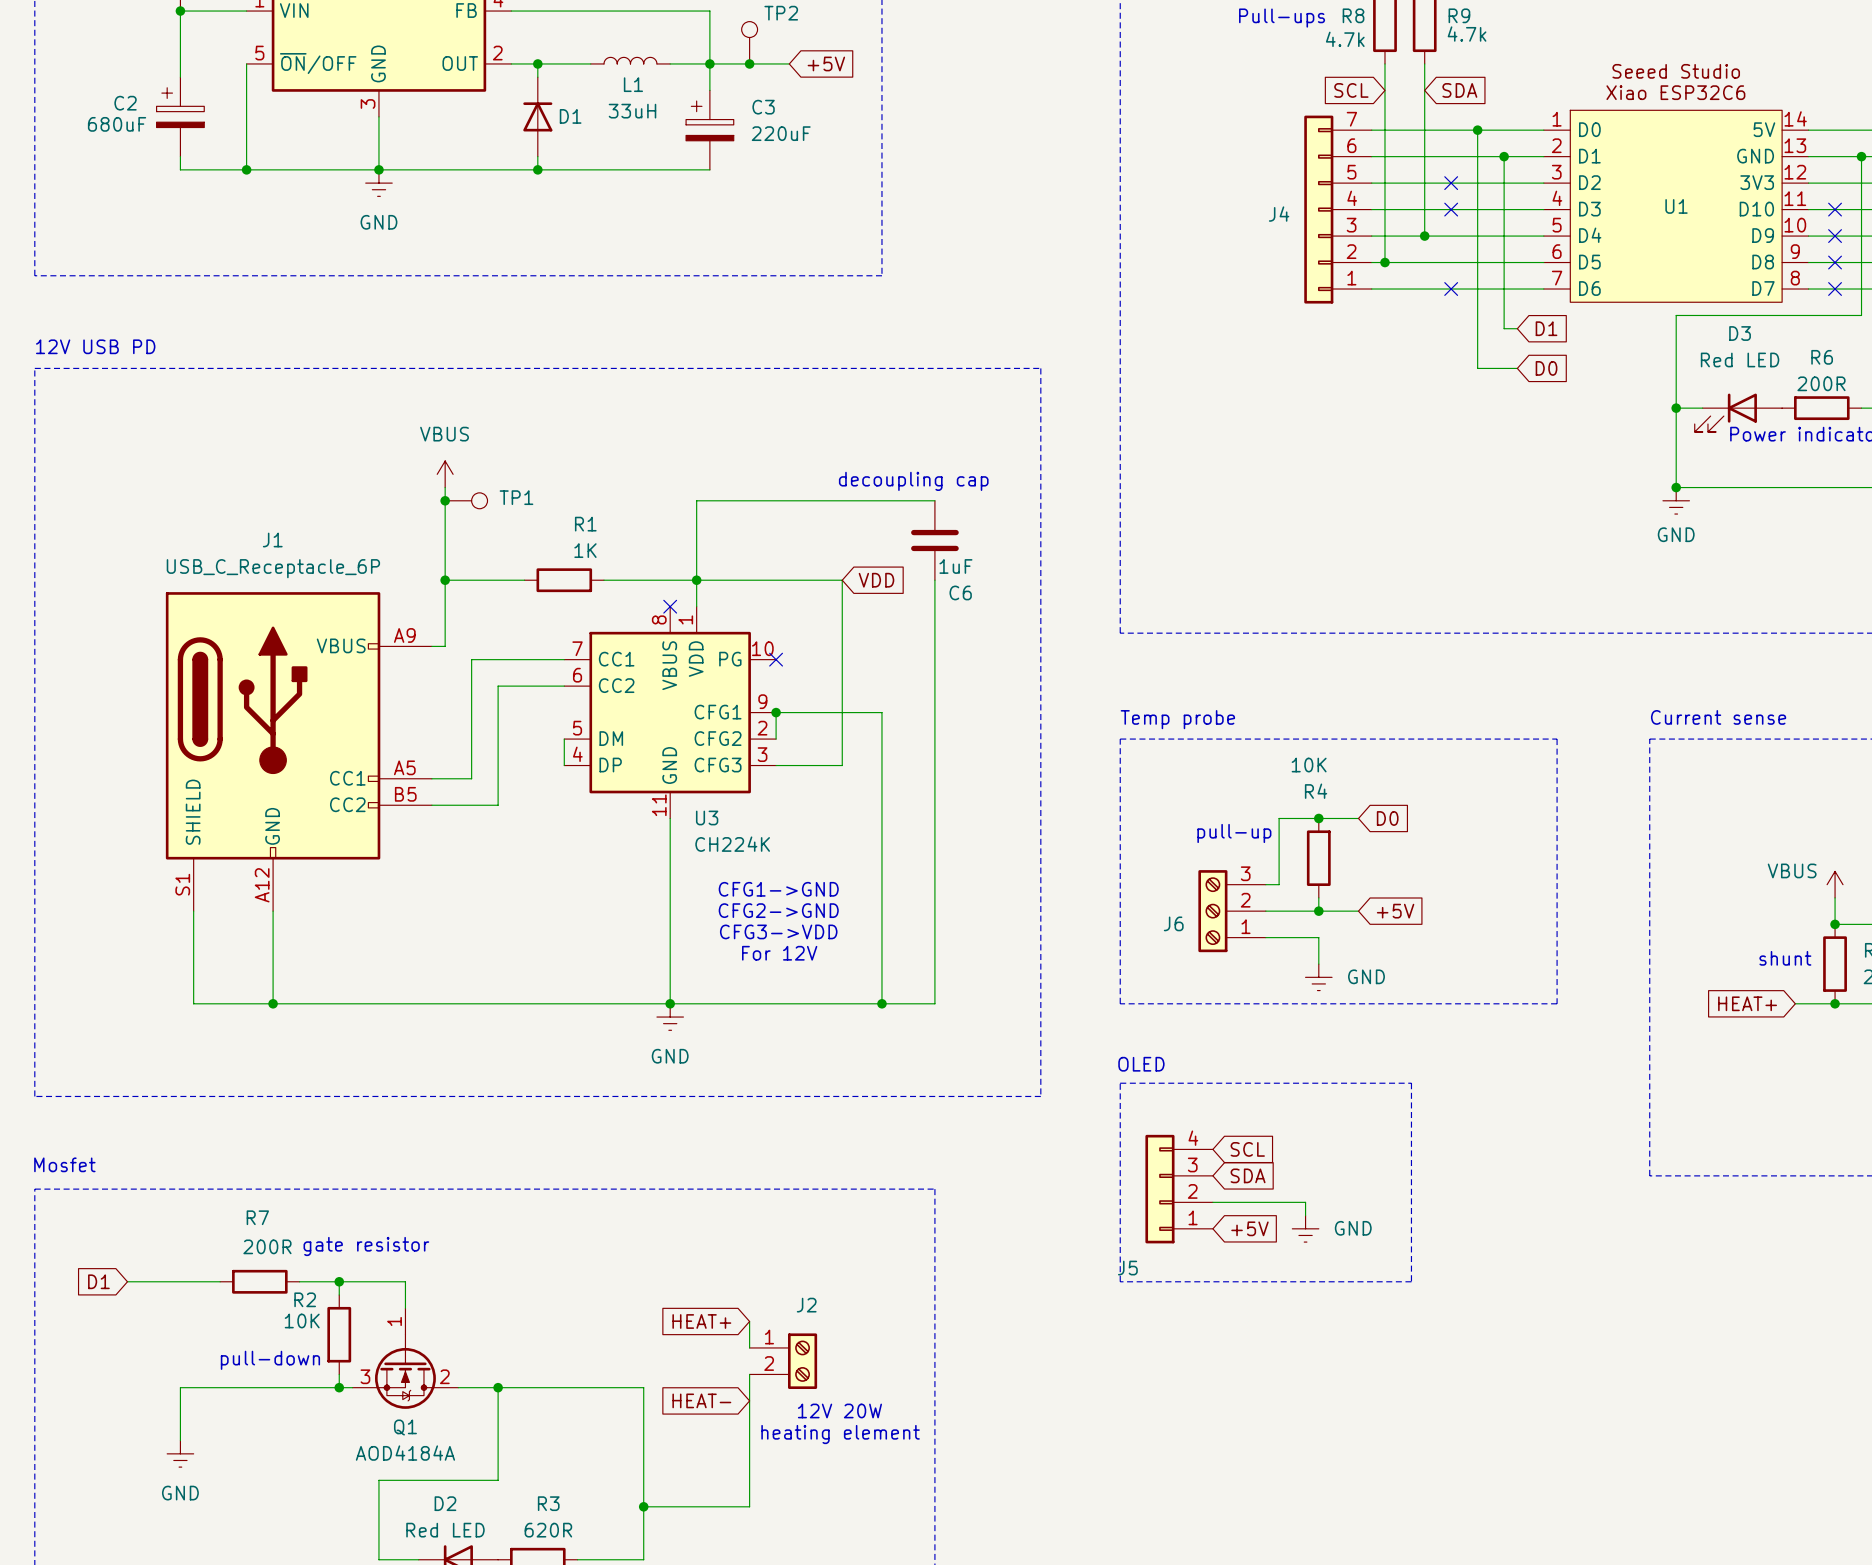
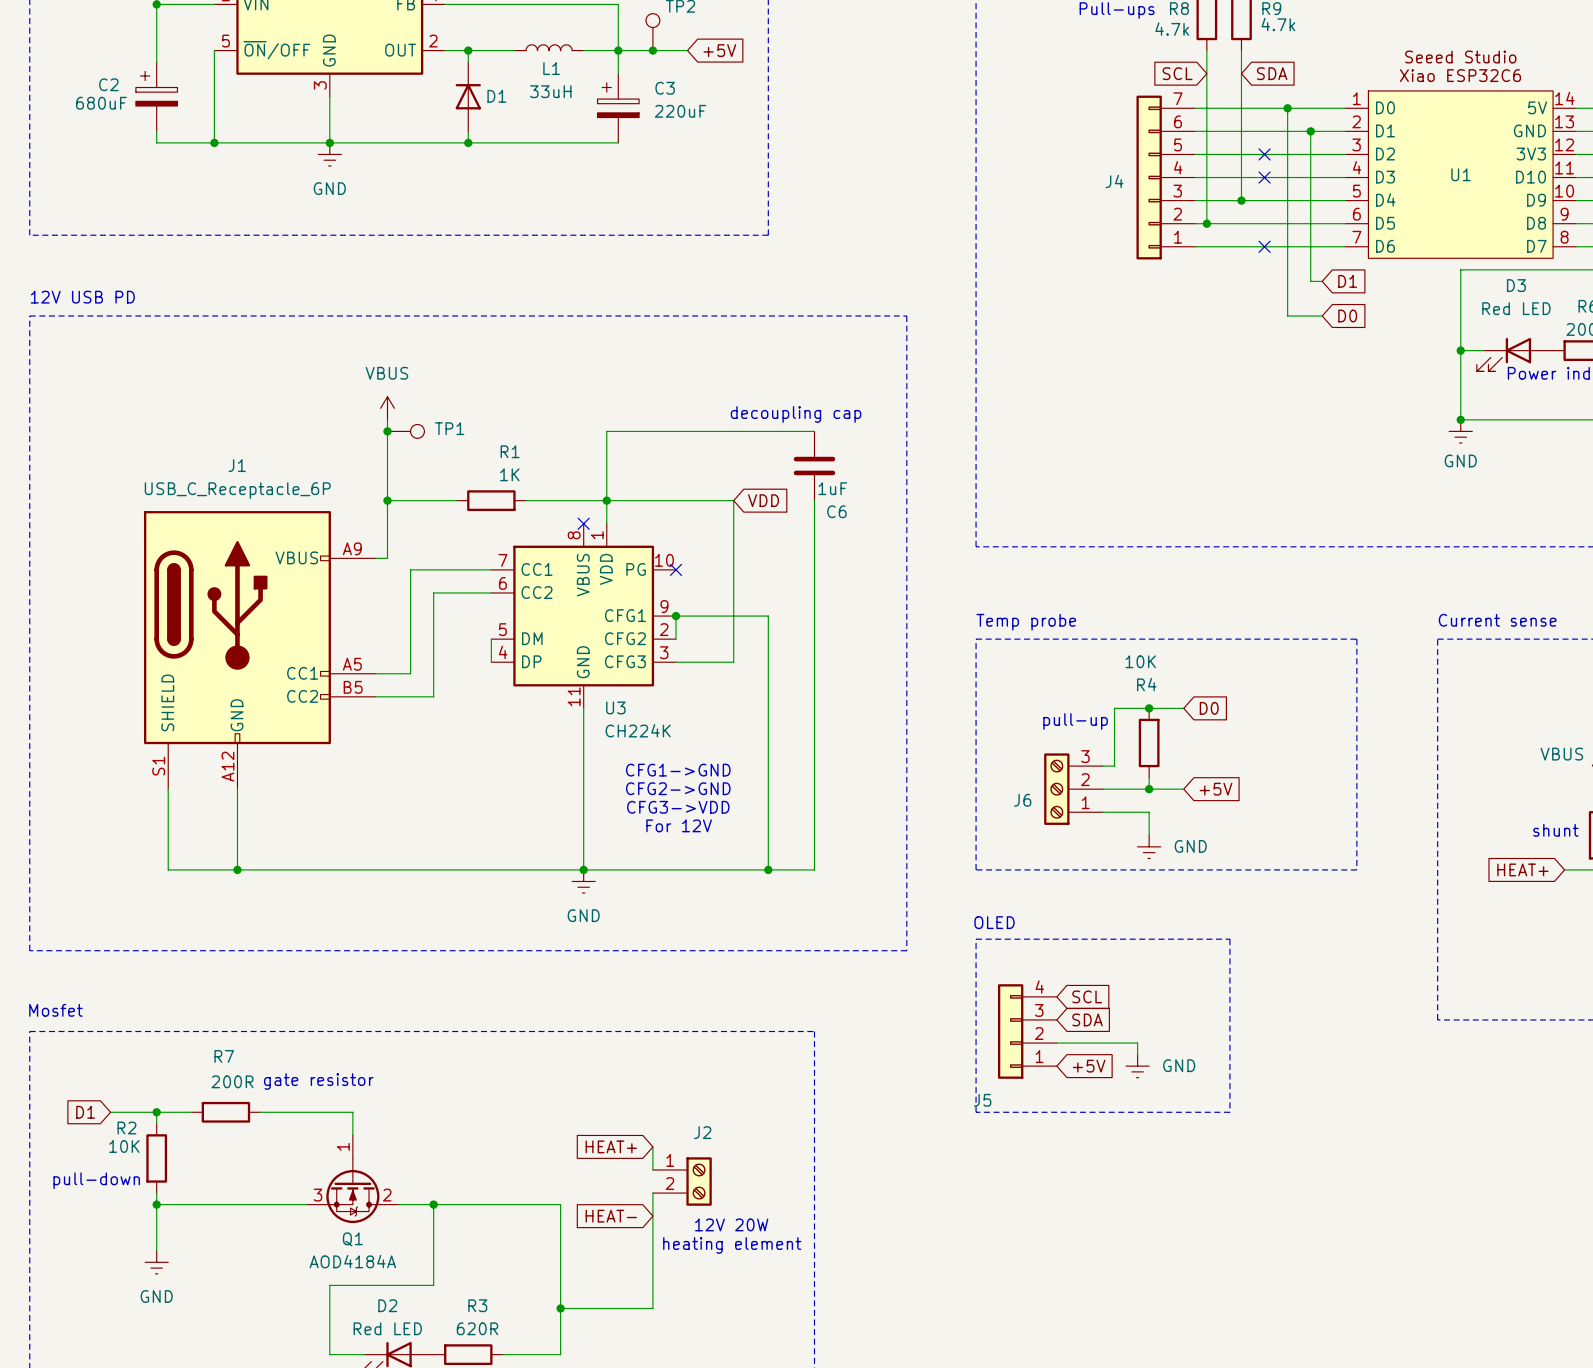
junction: none -> (156, 1112)
wire: (339, 1281) (339, 1295) -> (156, 1112) (156, 1123)
junction: (339, 1281) -> none
R2 position: (339, 1334) -> (156, 1158)
text position: pull-down (270, 1360) -> pull-down (96, 1180)
wire: (339, 1374) (339, 1387) -> (156, 1193) (156, 1204)
junction: none -> (156, 1204)
junction: (339, 1387) -> none

